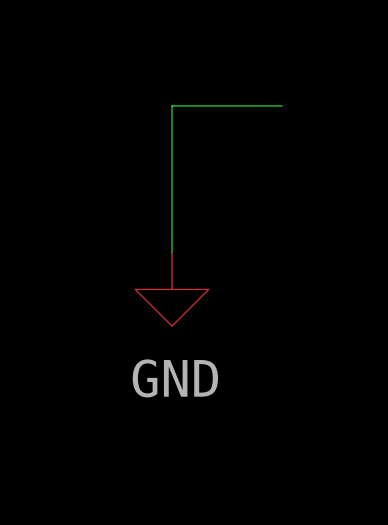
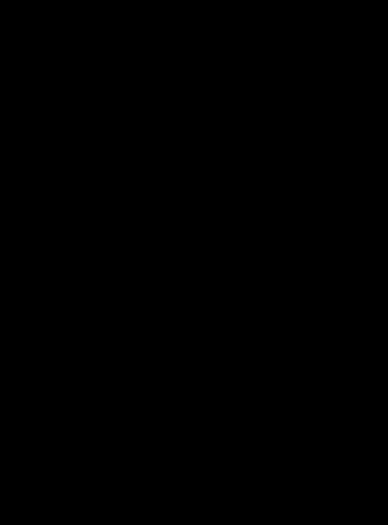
wire: (282, 105) (172, 105) (172, 252) -> none
power symbol: GND (172, 289) -> none

